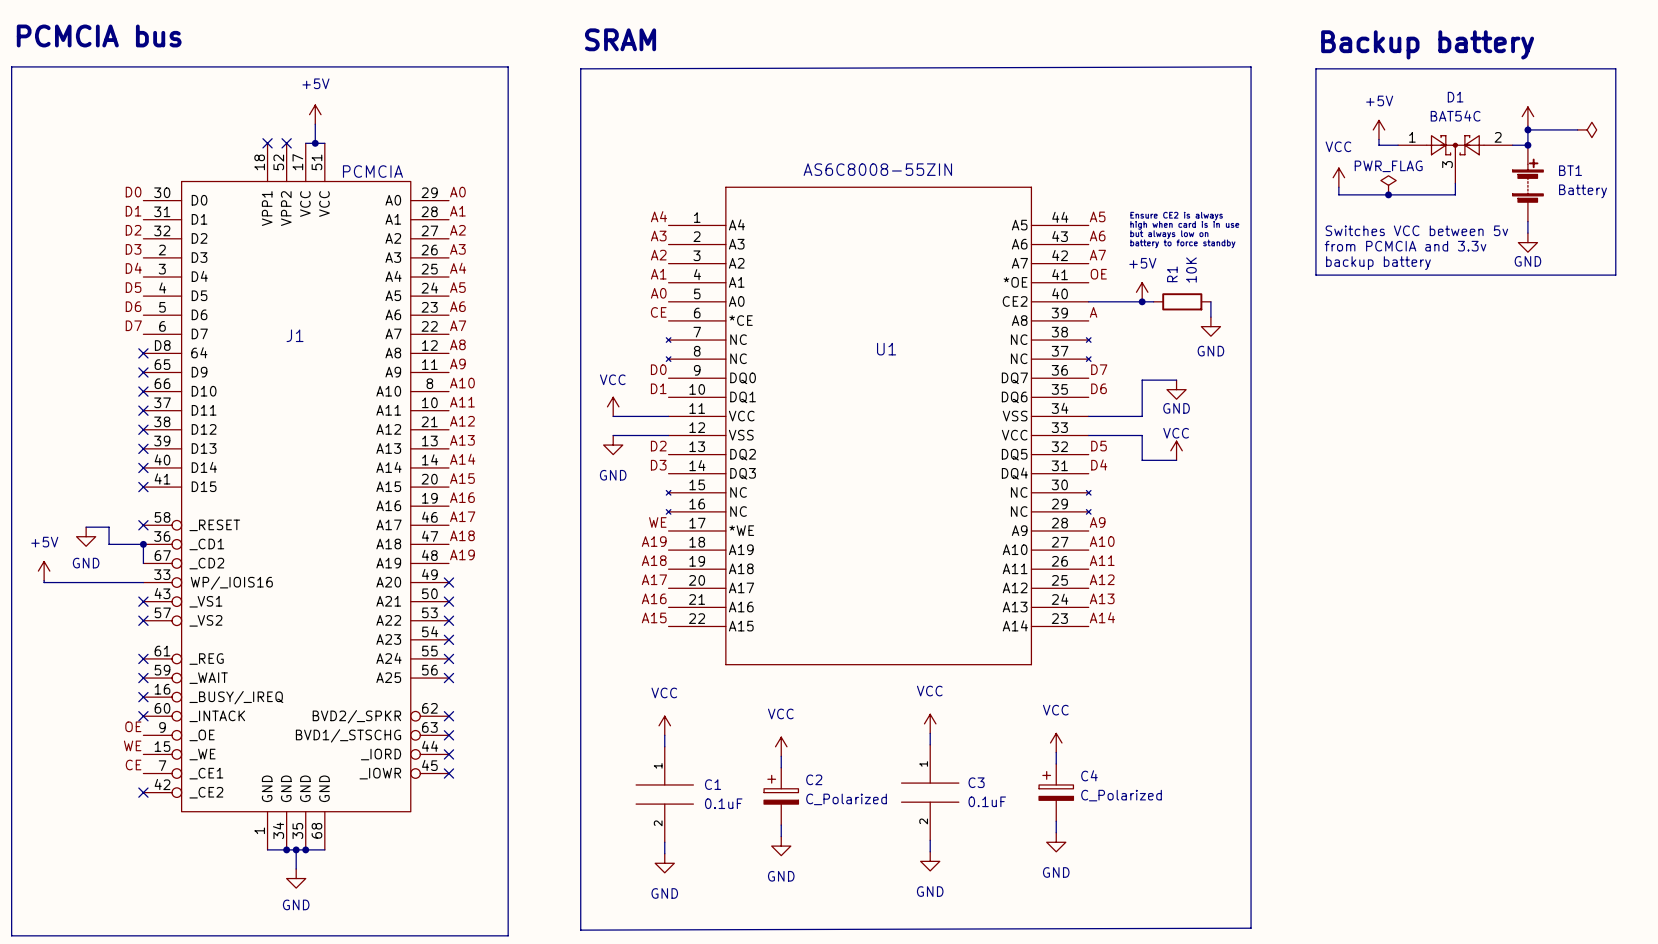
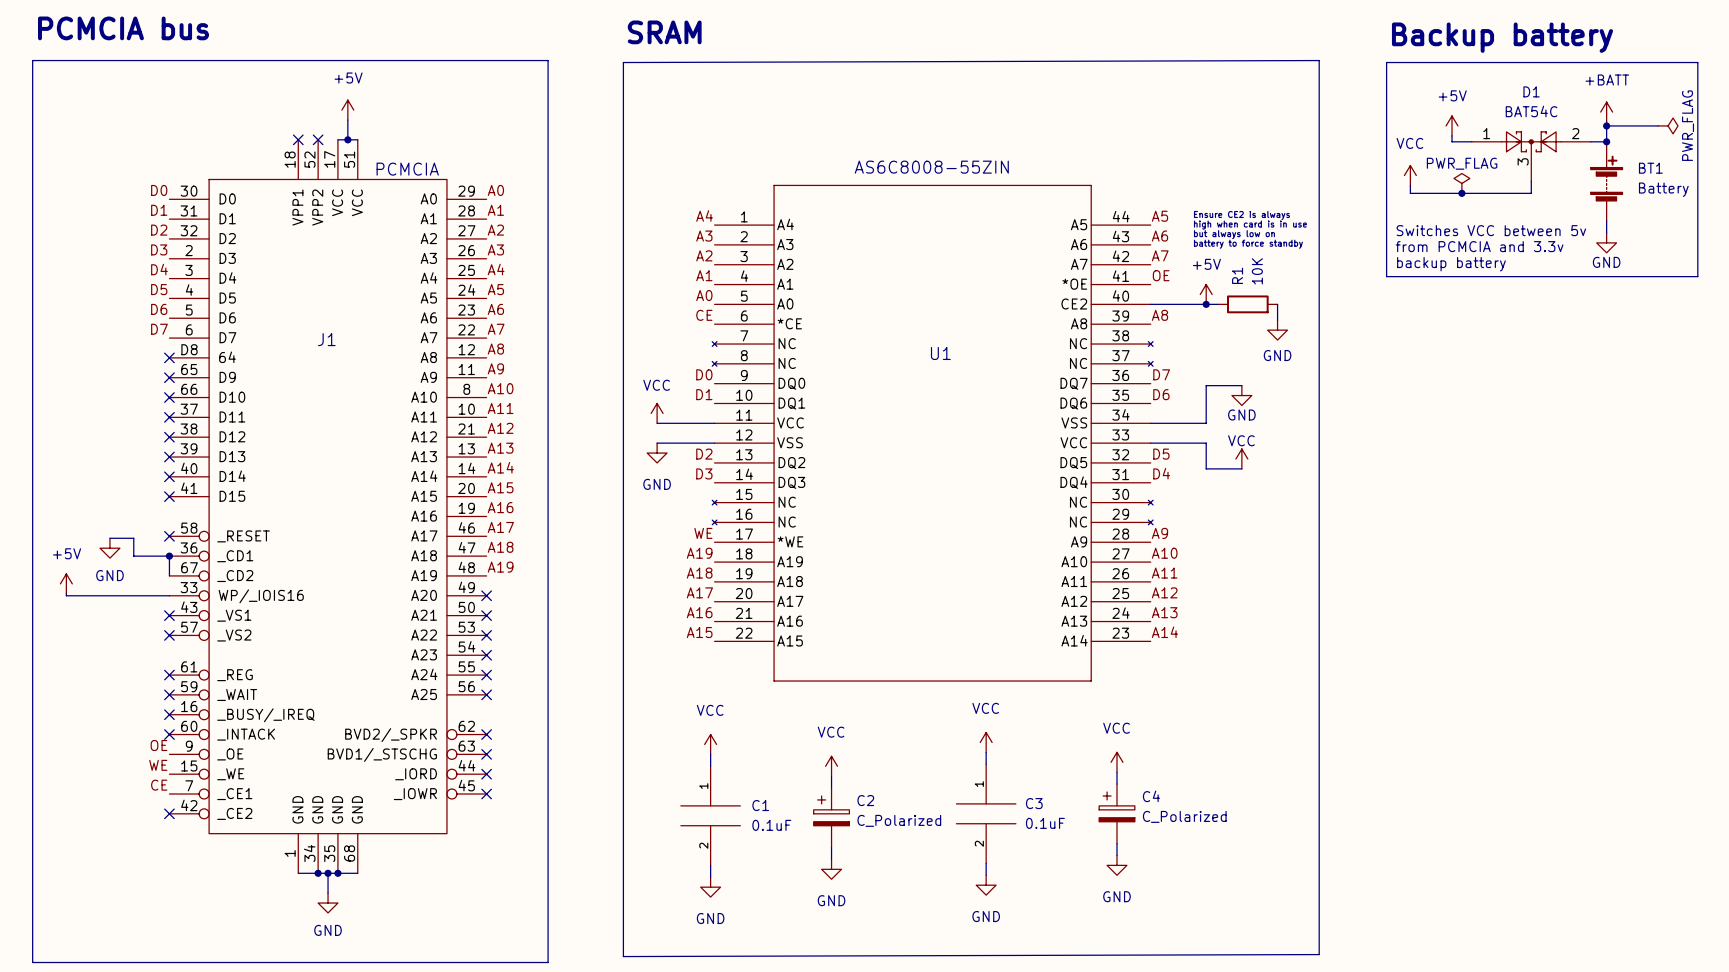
power symbol text: none -> +BATT (1607, 79)
power symbol text: none -> PWR_FLAG (1688, 125)
label: A (1093, 312) -> A8 (1159, 315)

